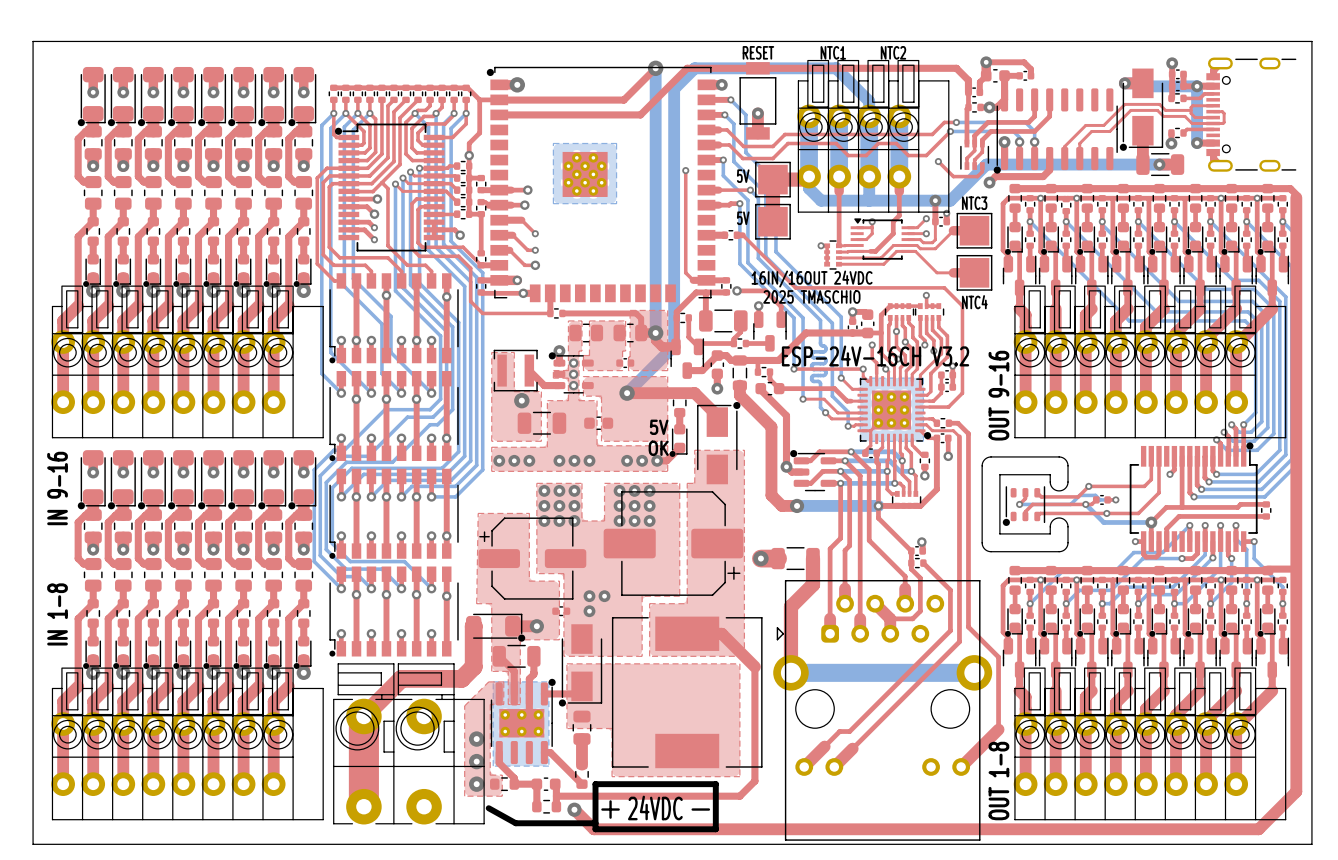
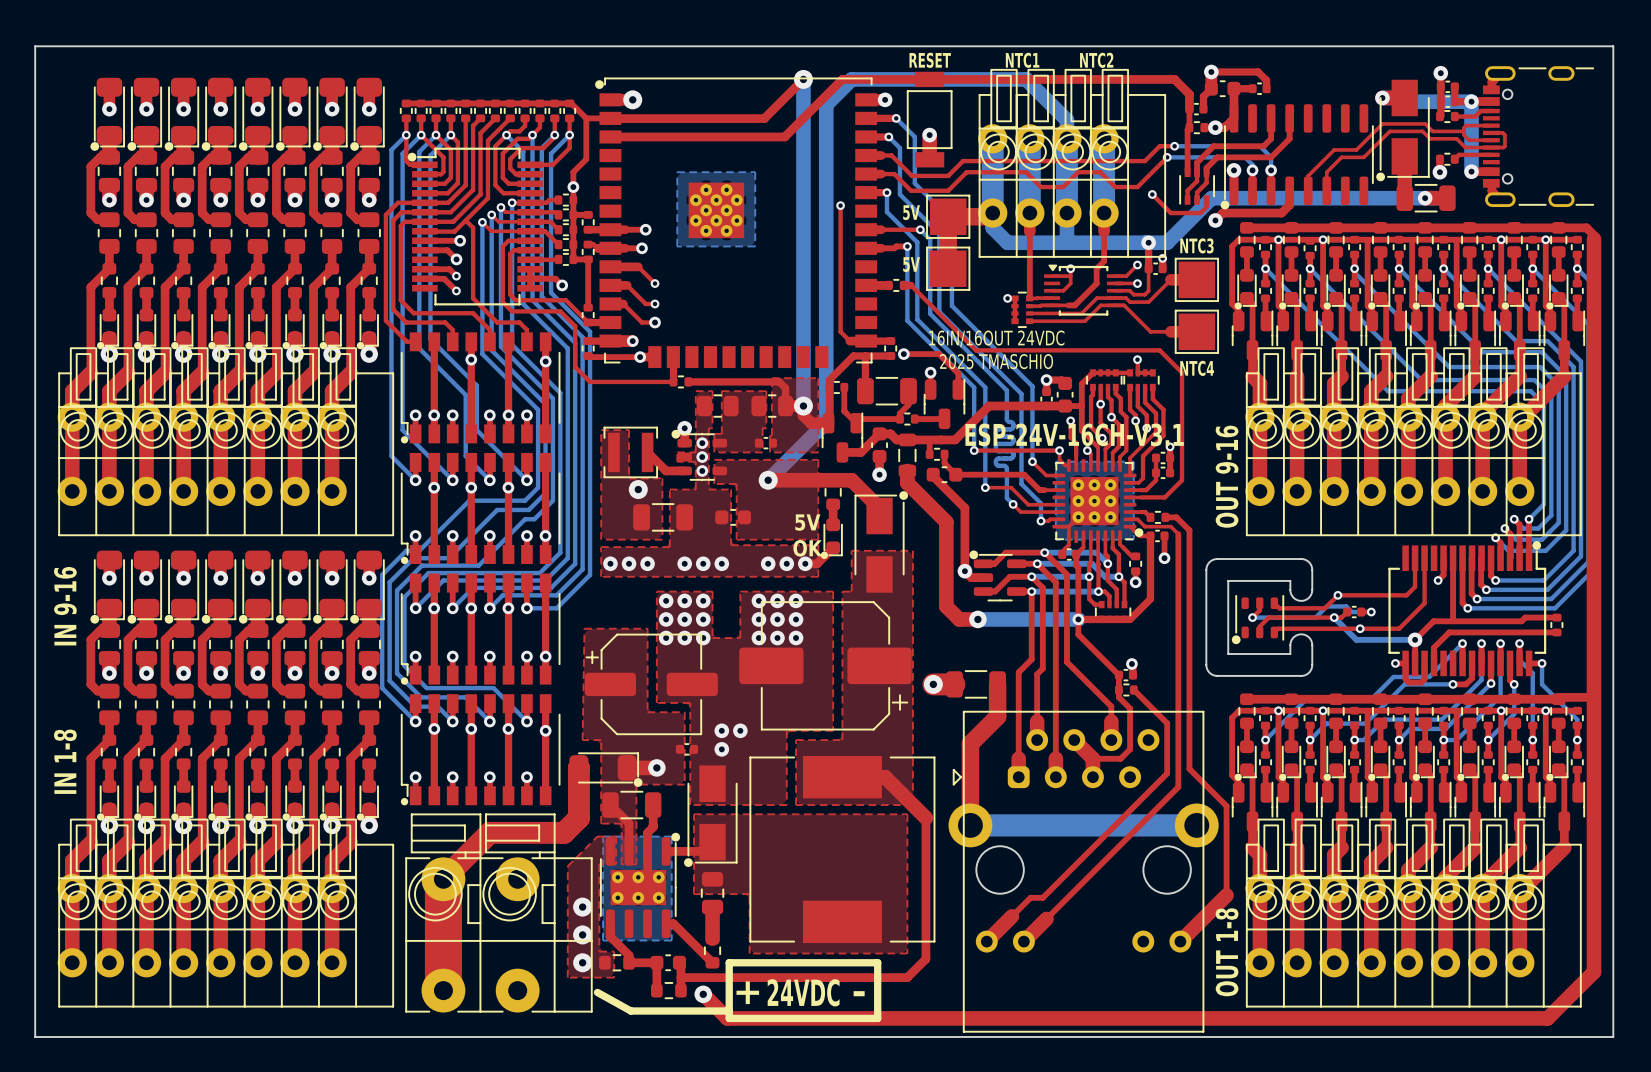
text: ESP-24V-16CH V3.2 (875, 355) -> ESP-24V-16CH-V3.1 (1074, 434)

